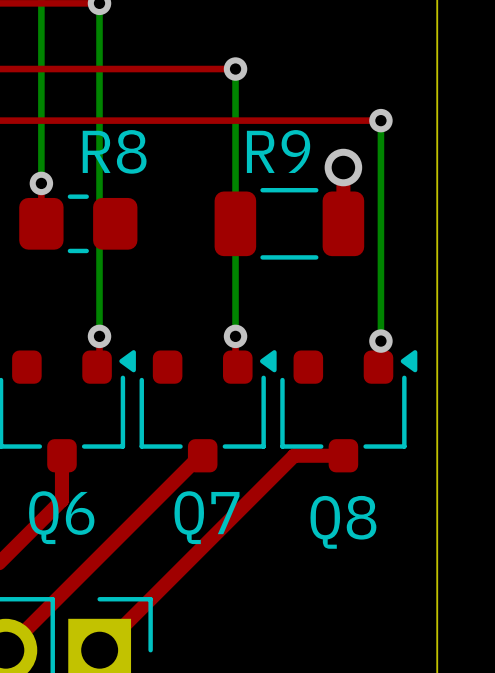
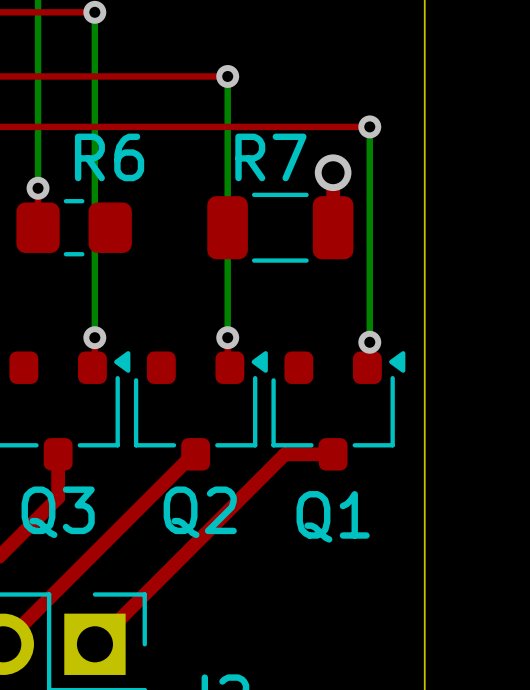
R8 name: R8 (114, 151) -> R6 (109, 157)
R9 name: R9 (278, 151) -> R7 (270, 157)
Q6 name: Q6 (61, 517) -> Q3 (58, 512)
Q7 name: Q7 (206, 517) -> Q2 (200, 512)
Q8 name: Q8 (343, 522) -> Q1 (333, 516)

